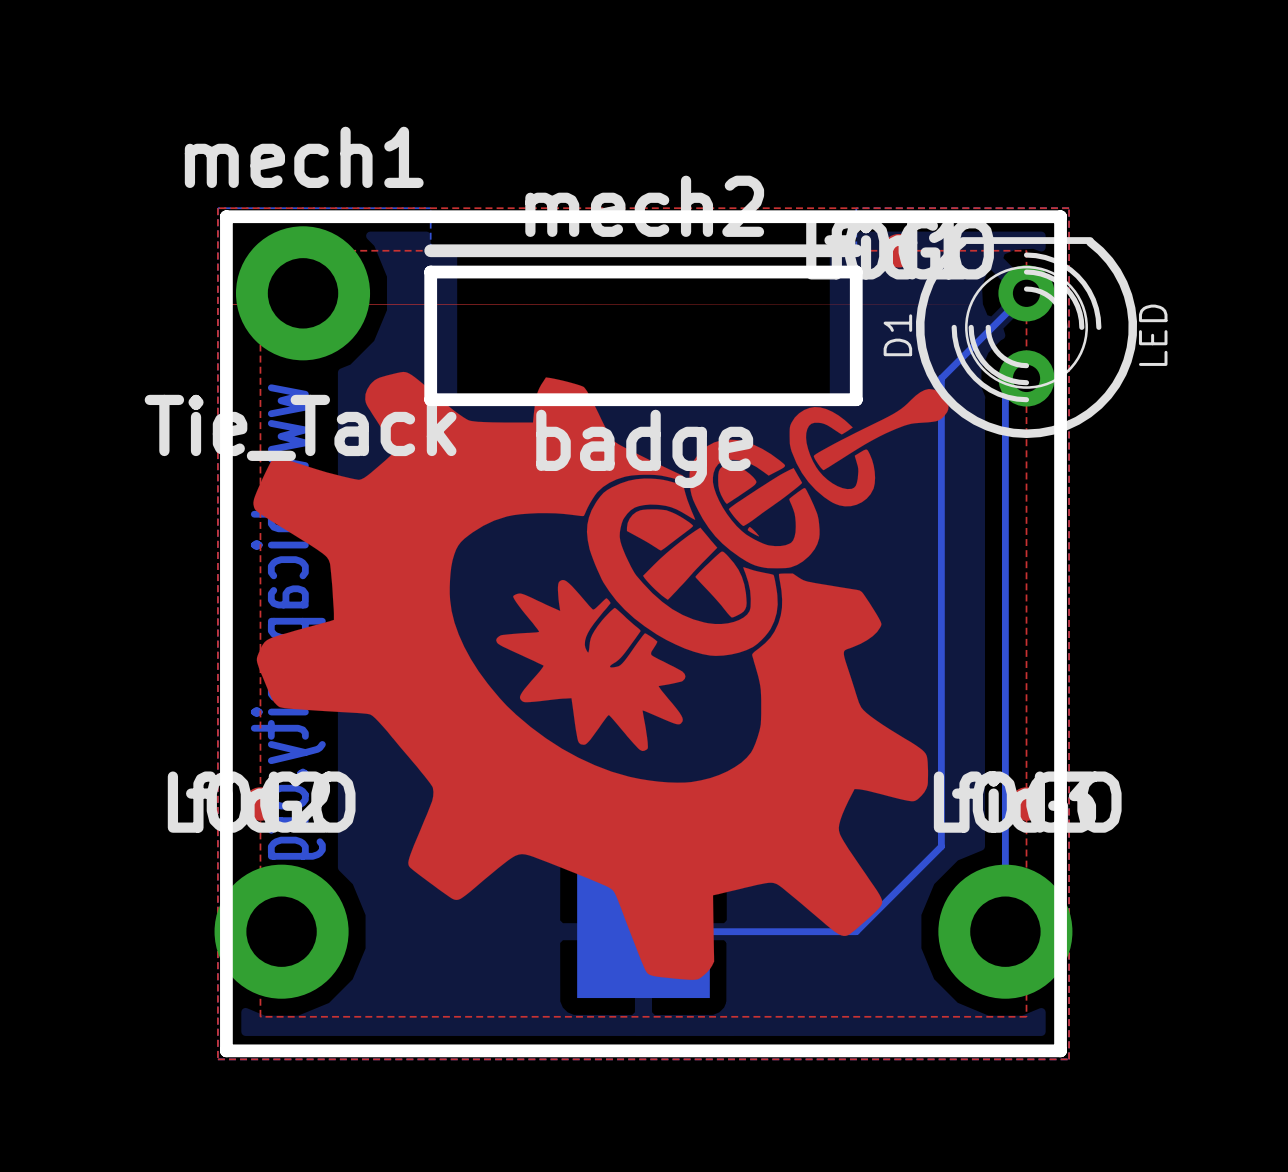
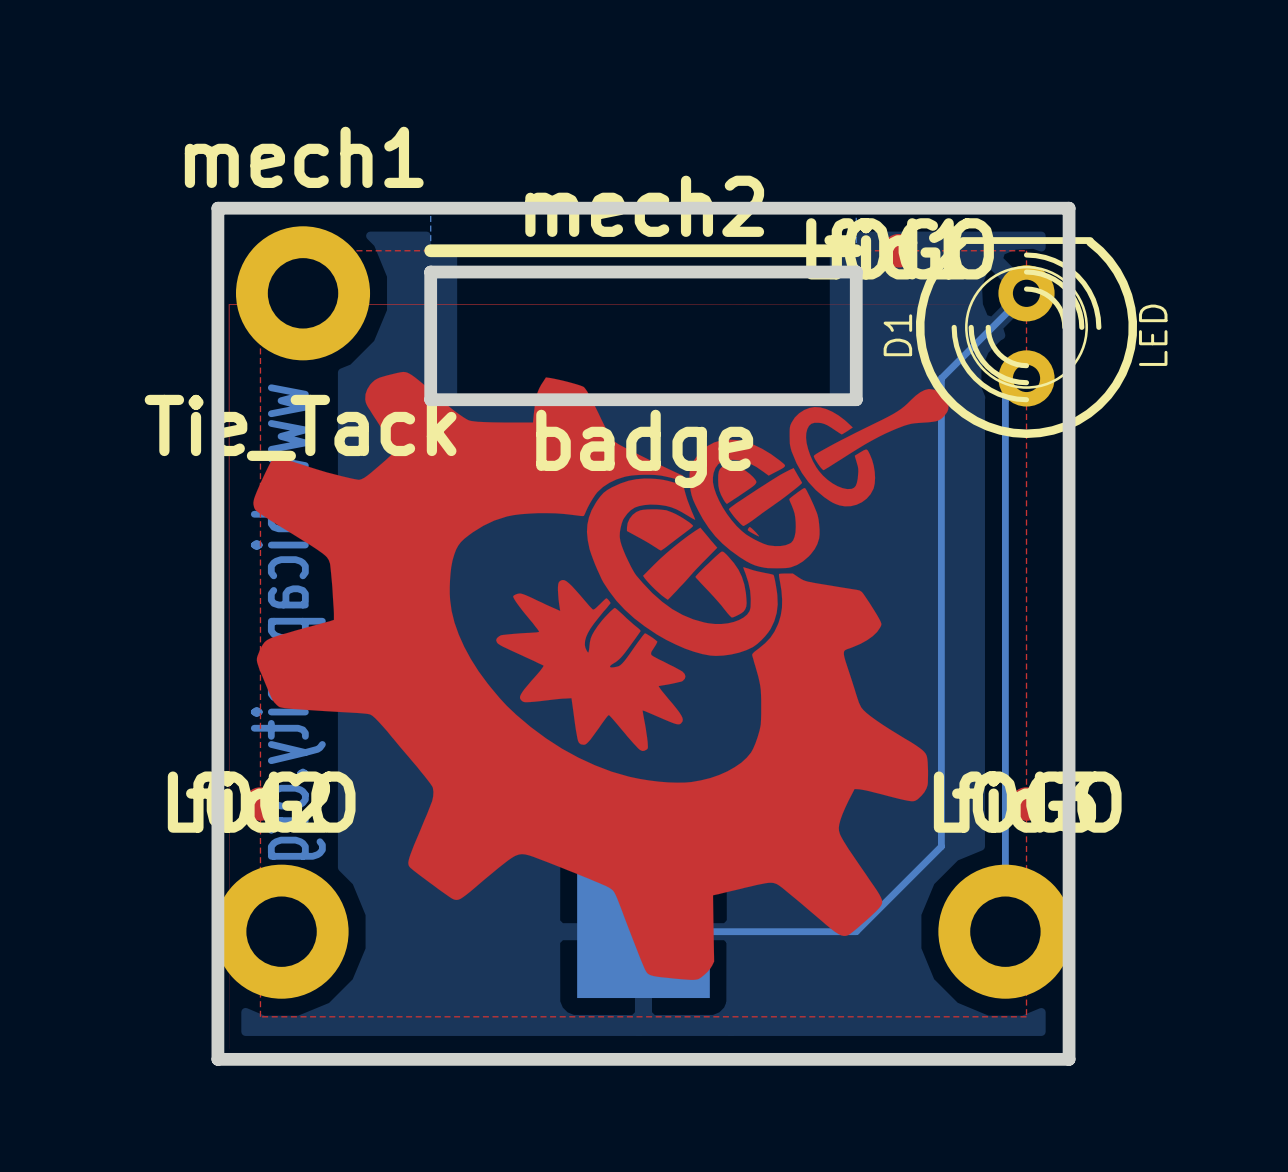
board edge: (226, 216) (226, 1050) (1060, 1050) (1060, 216) (226, 216) -> (217, 208) (217, 1059) (1069, 1059) (1069, 208) (217, 208)

